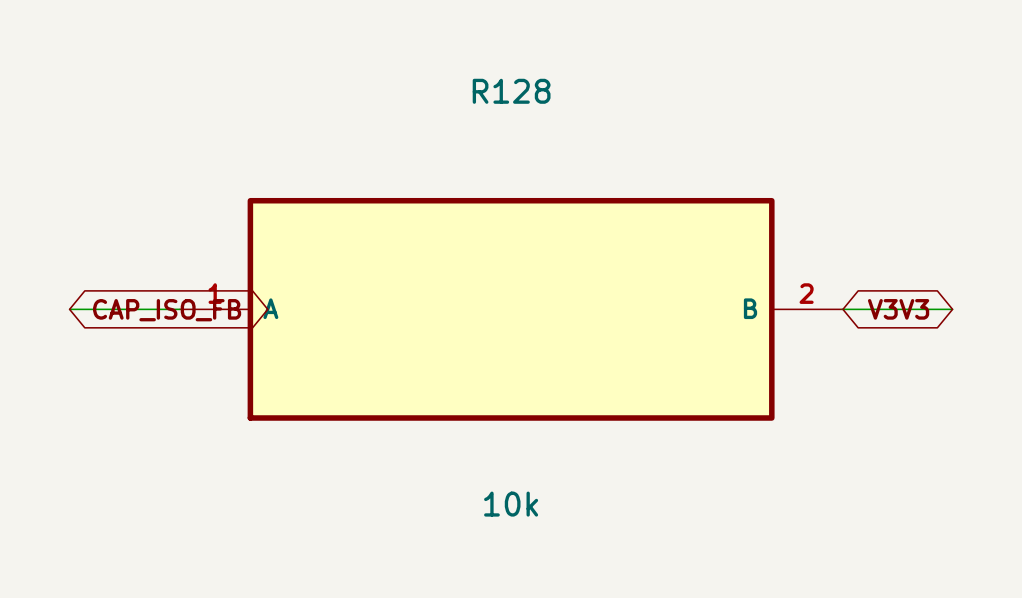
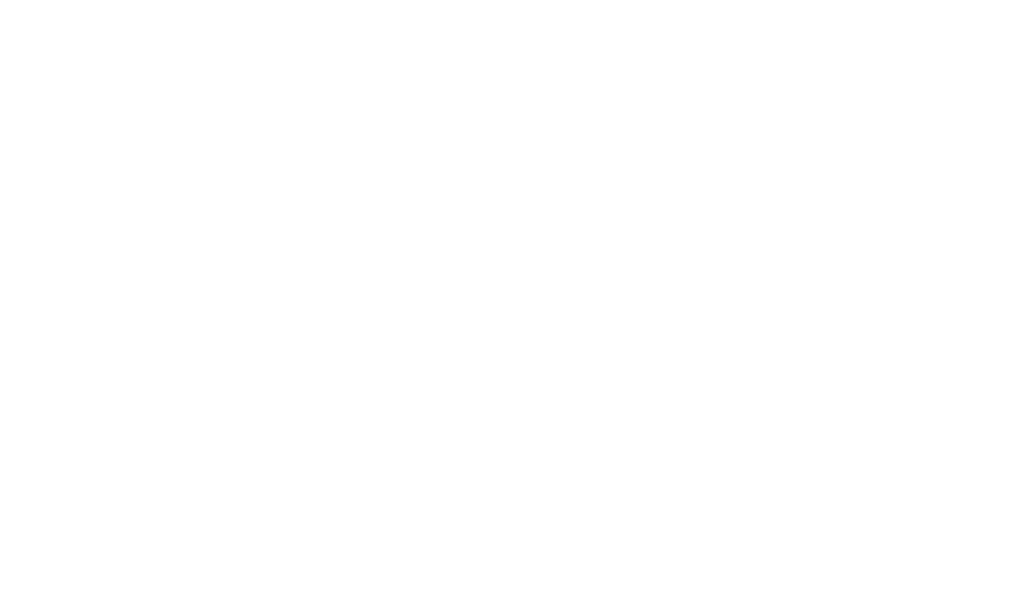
wire: (69, 309) (179, 309) -> none
R128: 10k (511, 309) -> none
wire: (842, 309) (952, 309) -> none
global label: V3V3 (898, 309) -> none
global label: CAP_ISO_FB (167, 310) -> none

